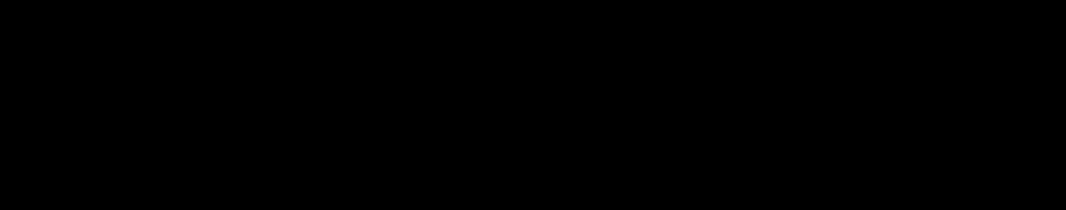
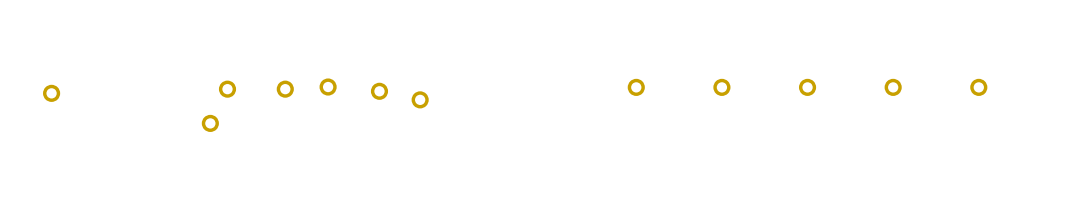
part: none -> (328, 87)
part: none -> (636, 87)
part: none -> (721, 87)
part: none -> (807, 87)
part: none -> (893, 87)
part: none -> (978, 87)
part: none -> (227, 89)
part: none -> (285, 89)
part: none -> (379, 91)
part: none -> (51, 93)
part: none -> (420, 99)
part: none -> (210, 123)

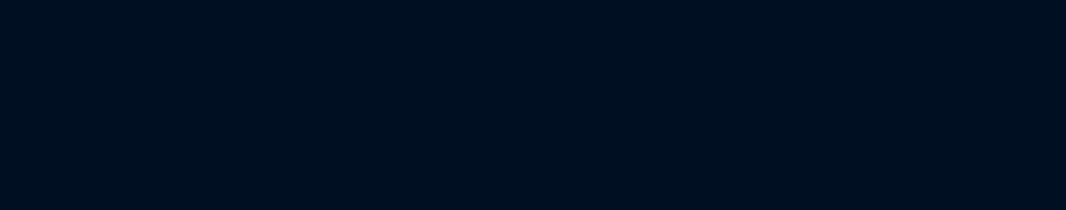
part: (328, 87) -> none
part: (636, 87) -> none
part: (721, 87) -> none
part: (807, 87) -> none
part: (893, 87) -> none
part: (978, 87) -> none
part: (227, 89) -> none
part: (285, 89) -> none
part: (379, 91) -> none
part: (51, 93) -> none
part: (420, 99) -> none
part: (210, 123) -> none

